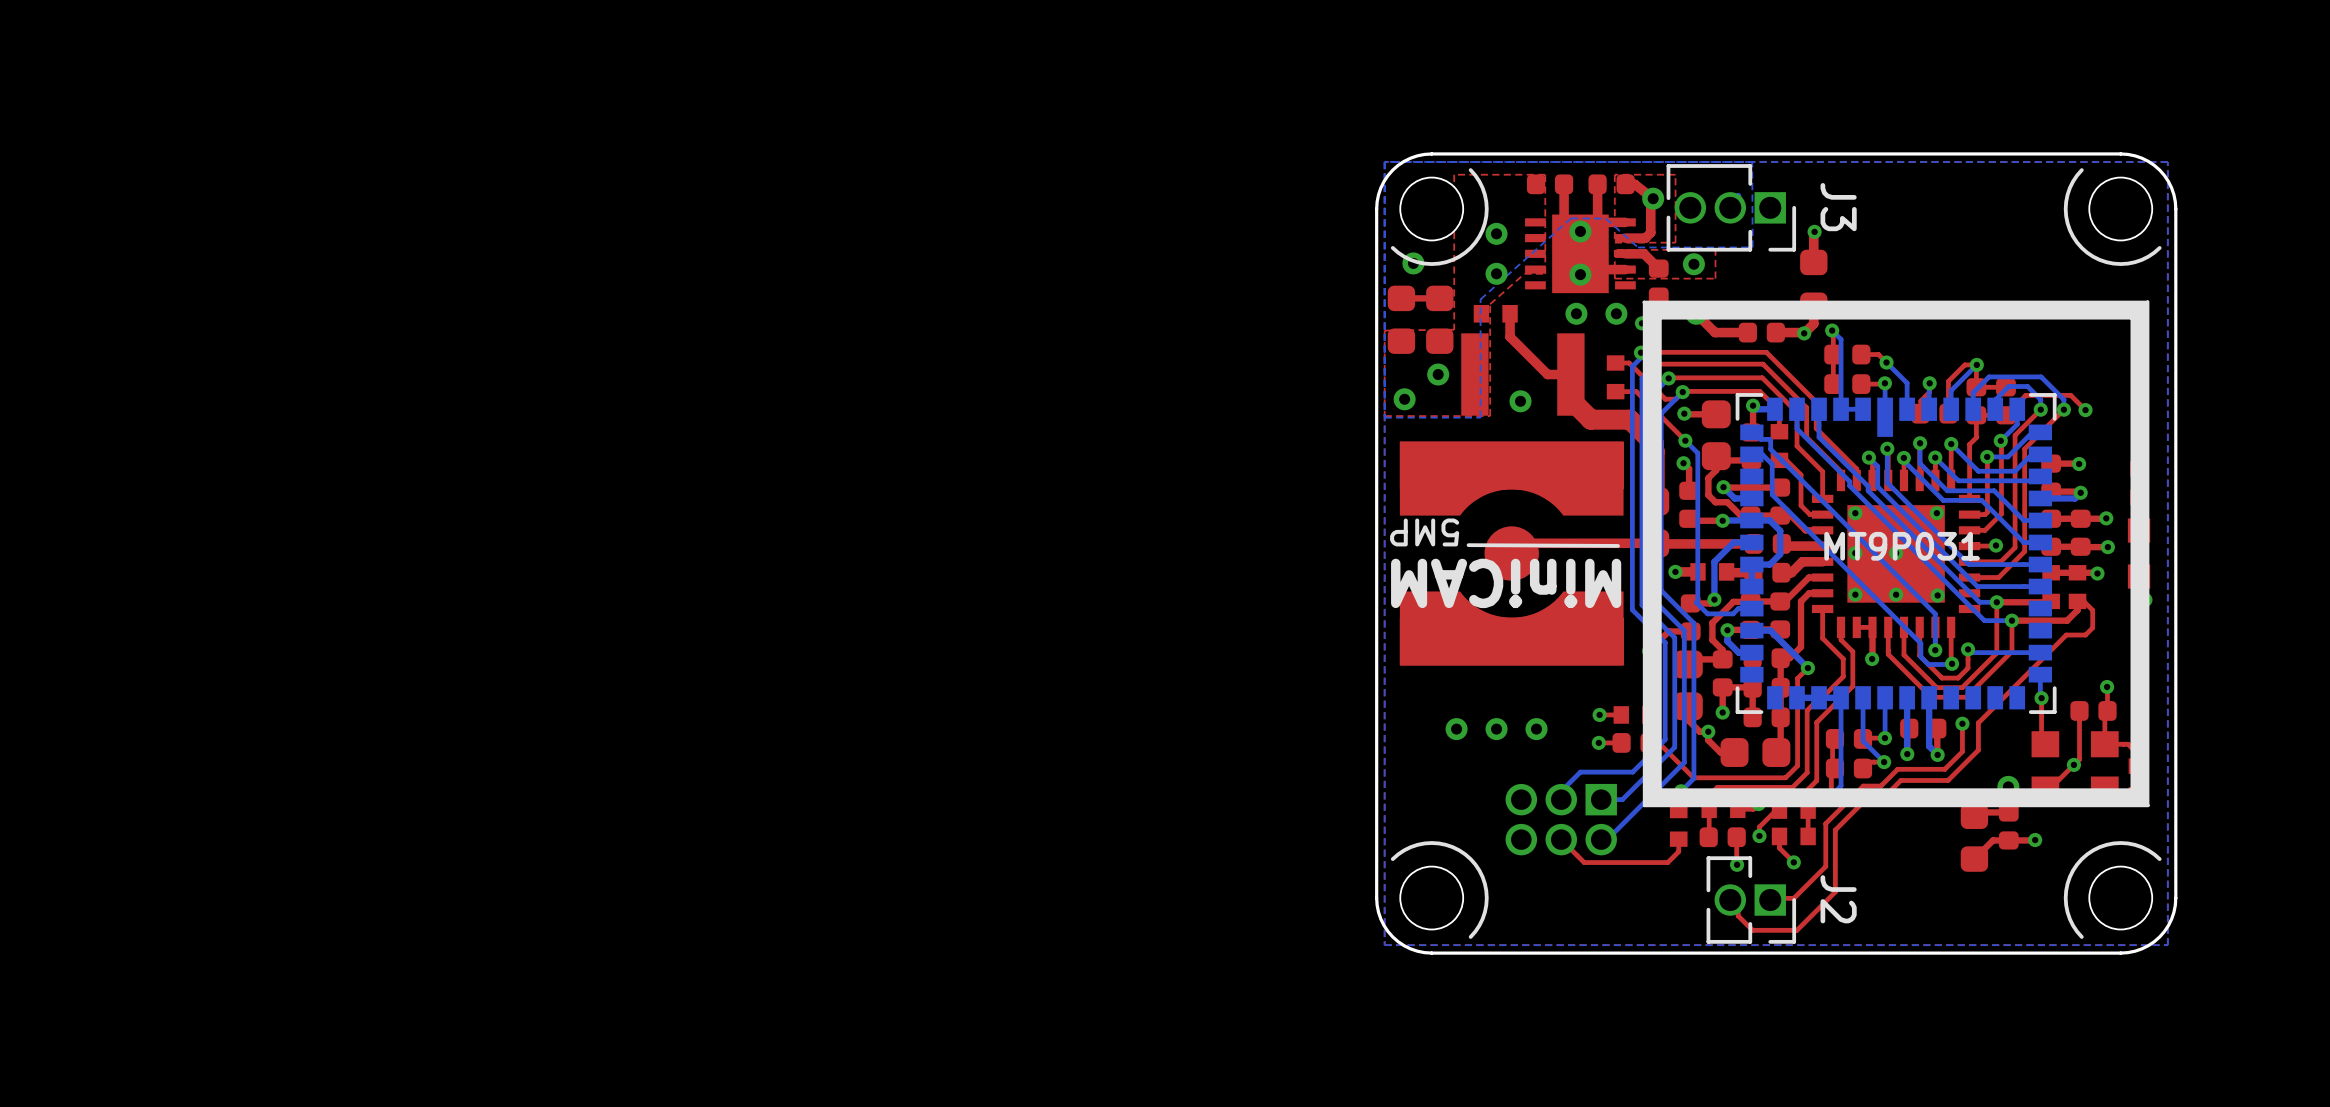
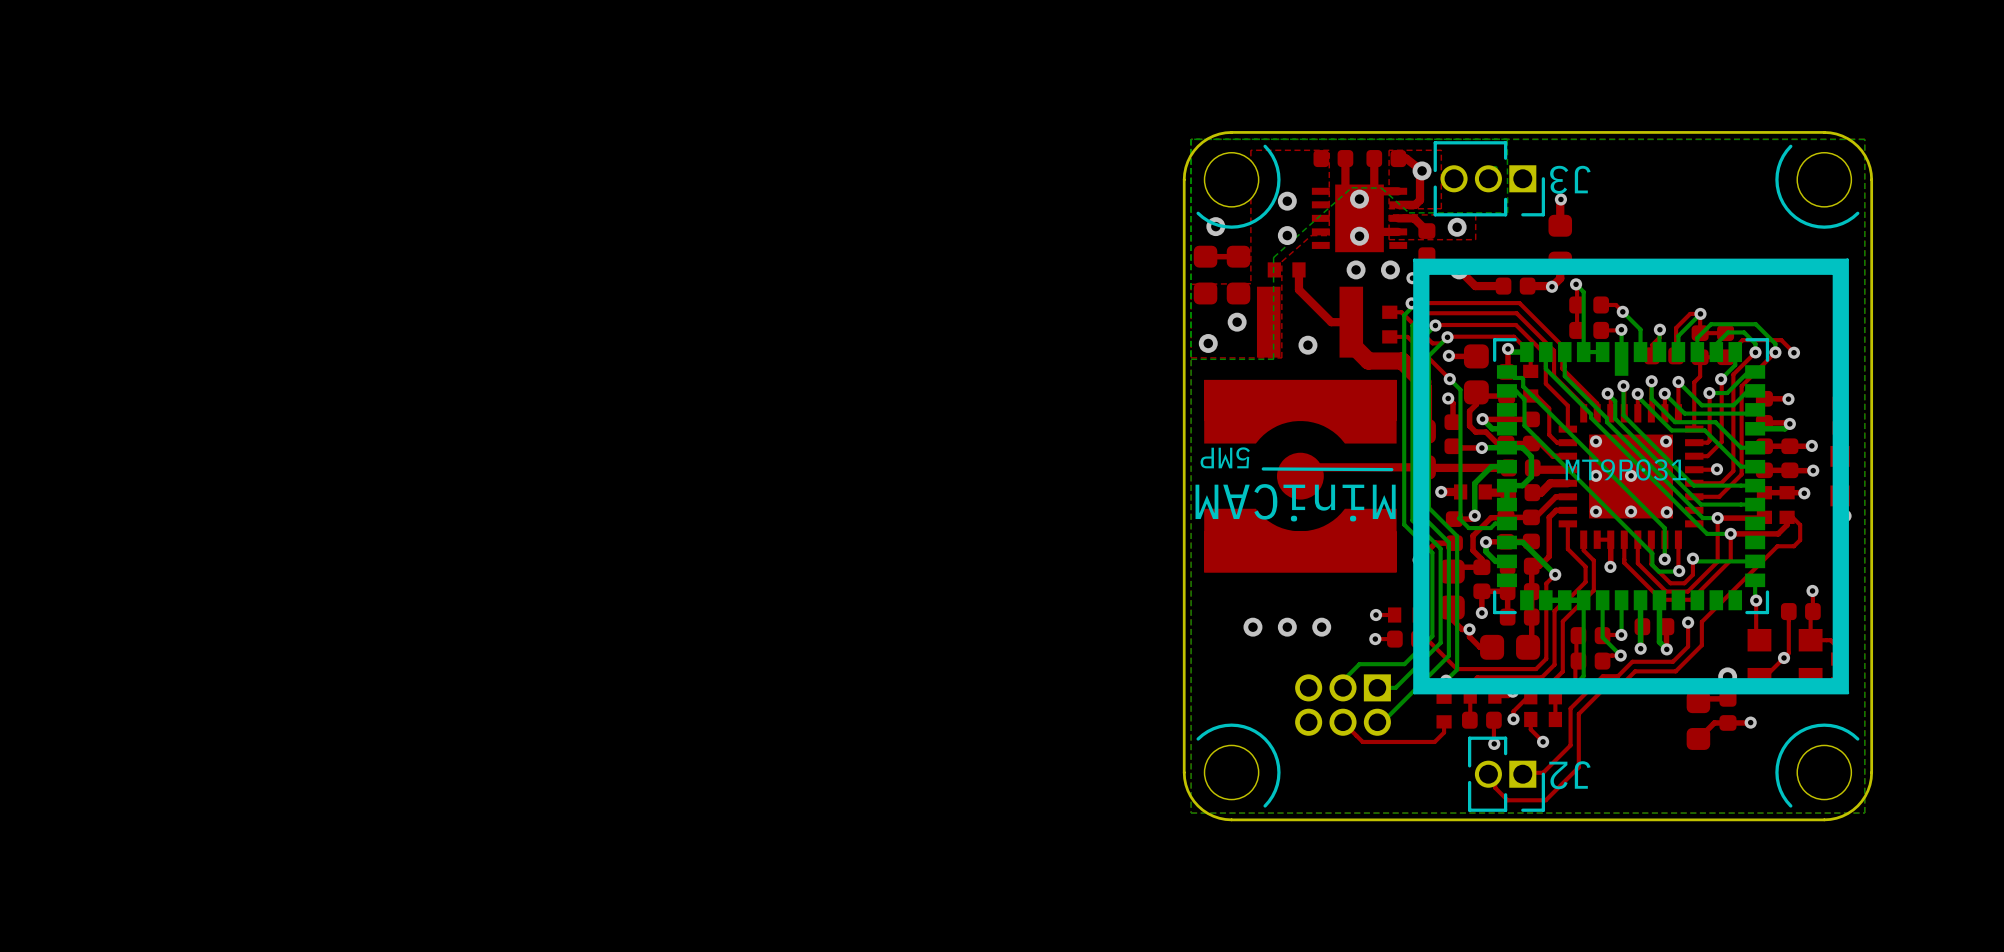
J3 name rotation: 0° (1838, 207) -> 90° clockwise (1570, 179)
J2 name rotation: 0° (1838, 899) -> 90° clockwise (1569, 775)

